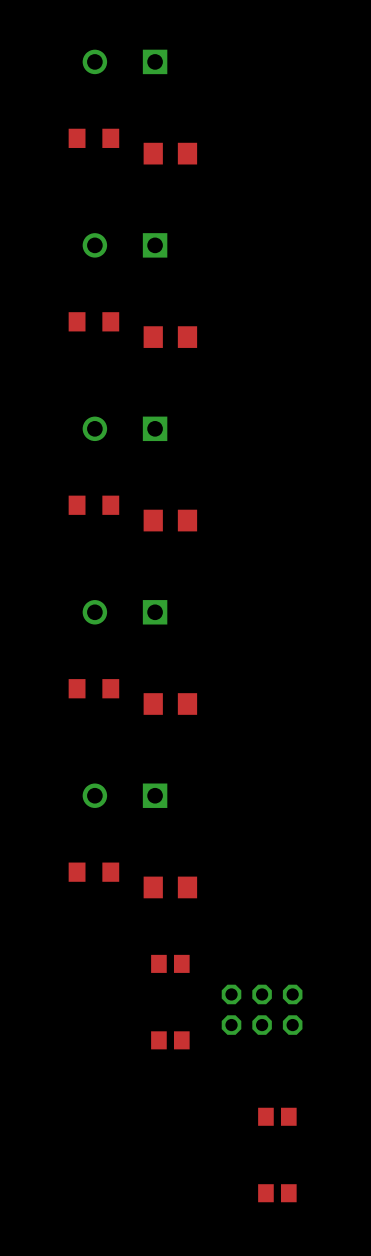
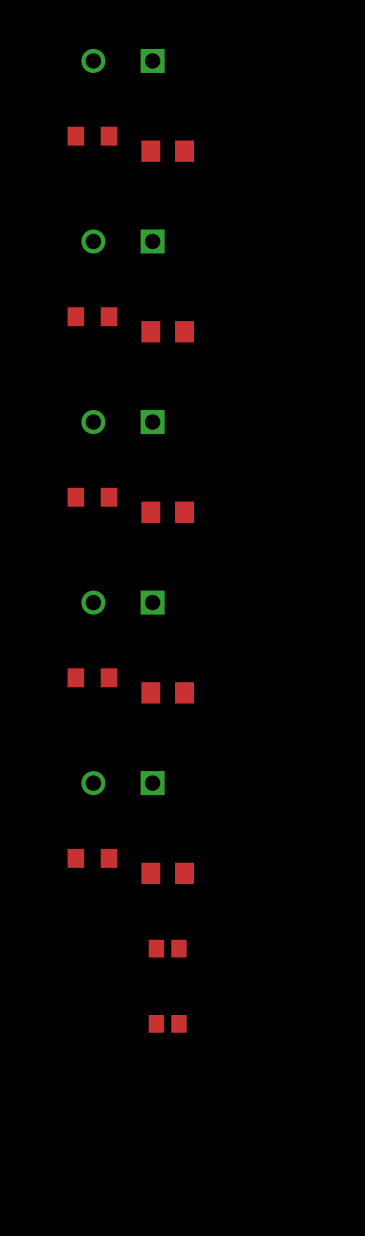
part: (262, 1009) -> none
part: (277, 1116) -> none
part: (277, 1193) -> none

